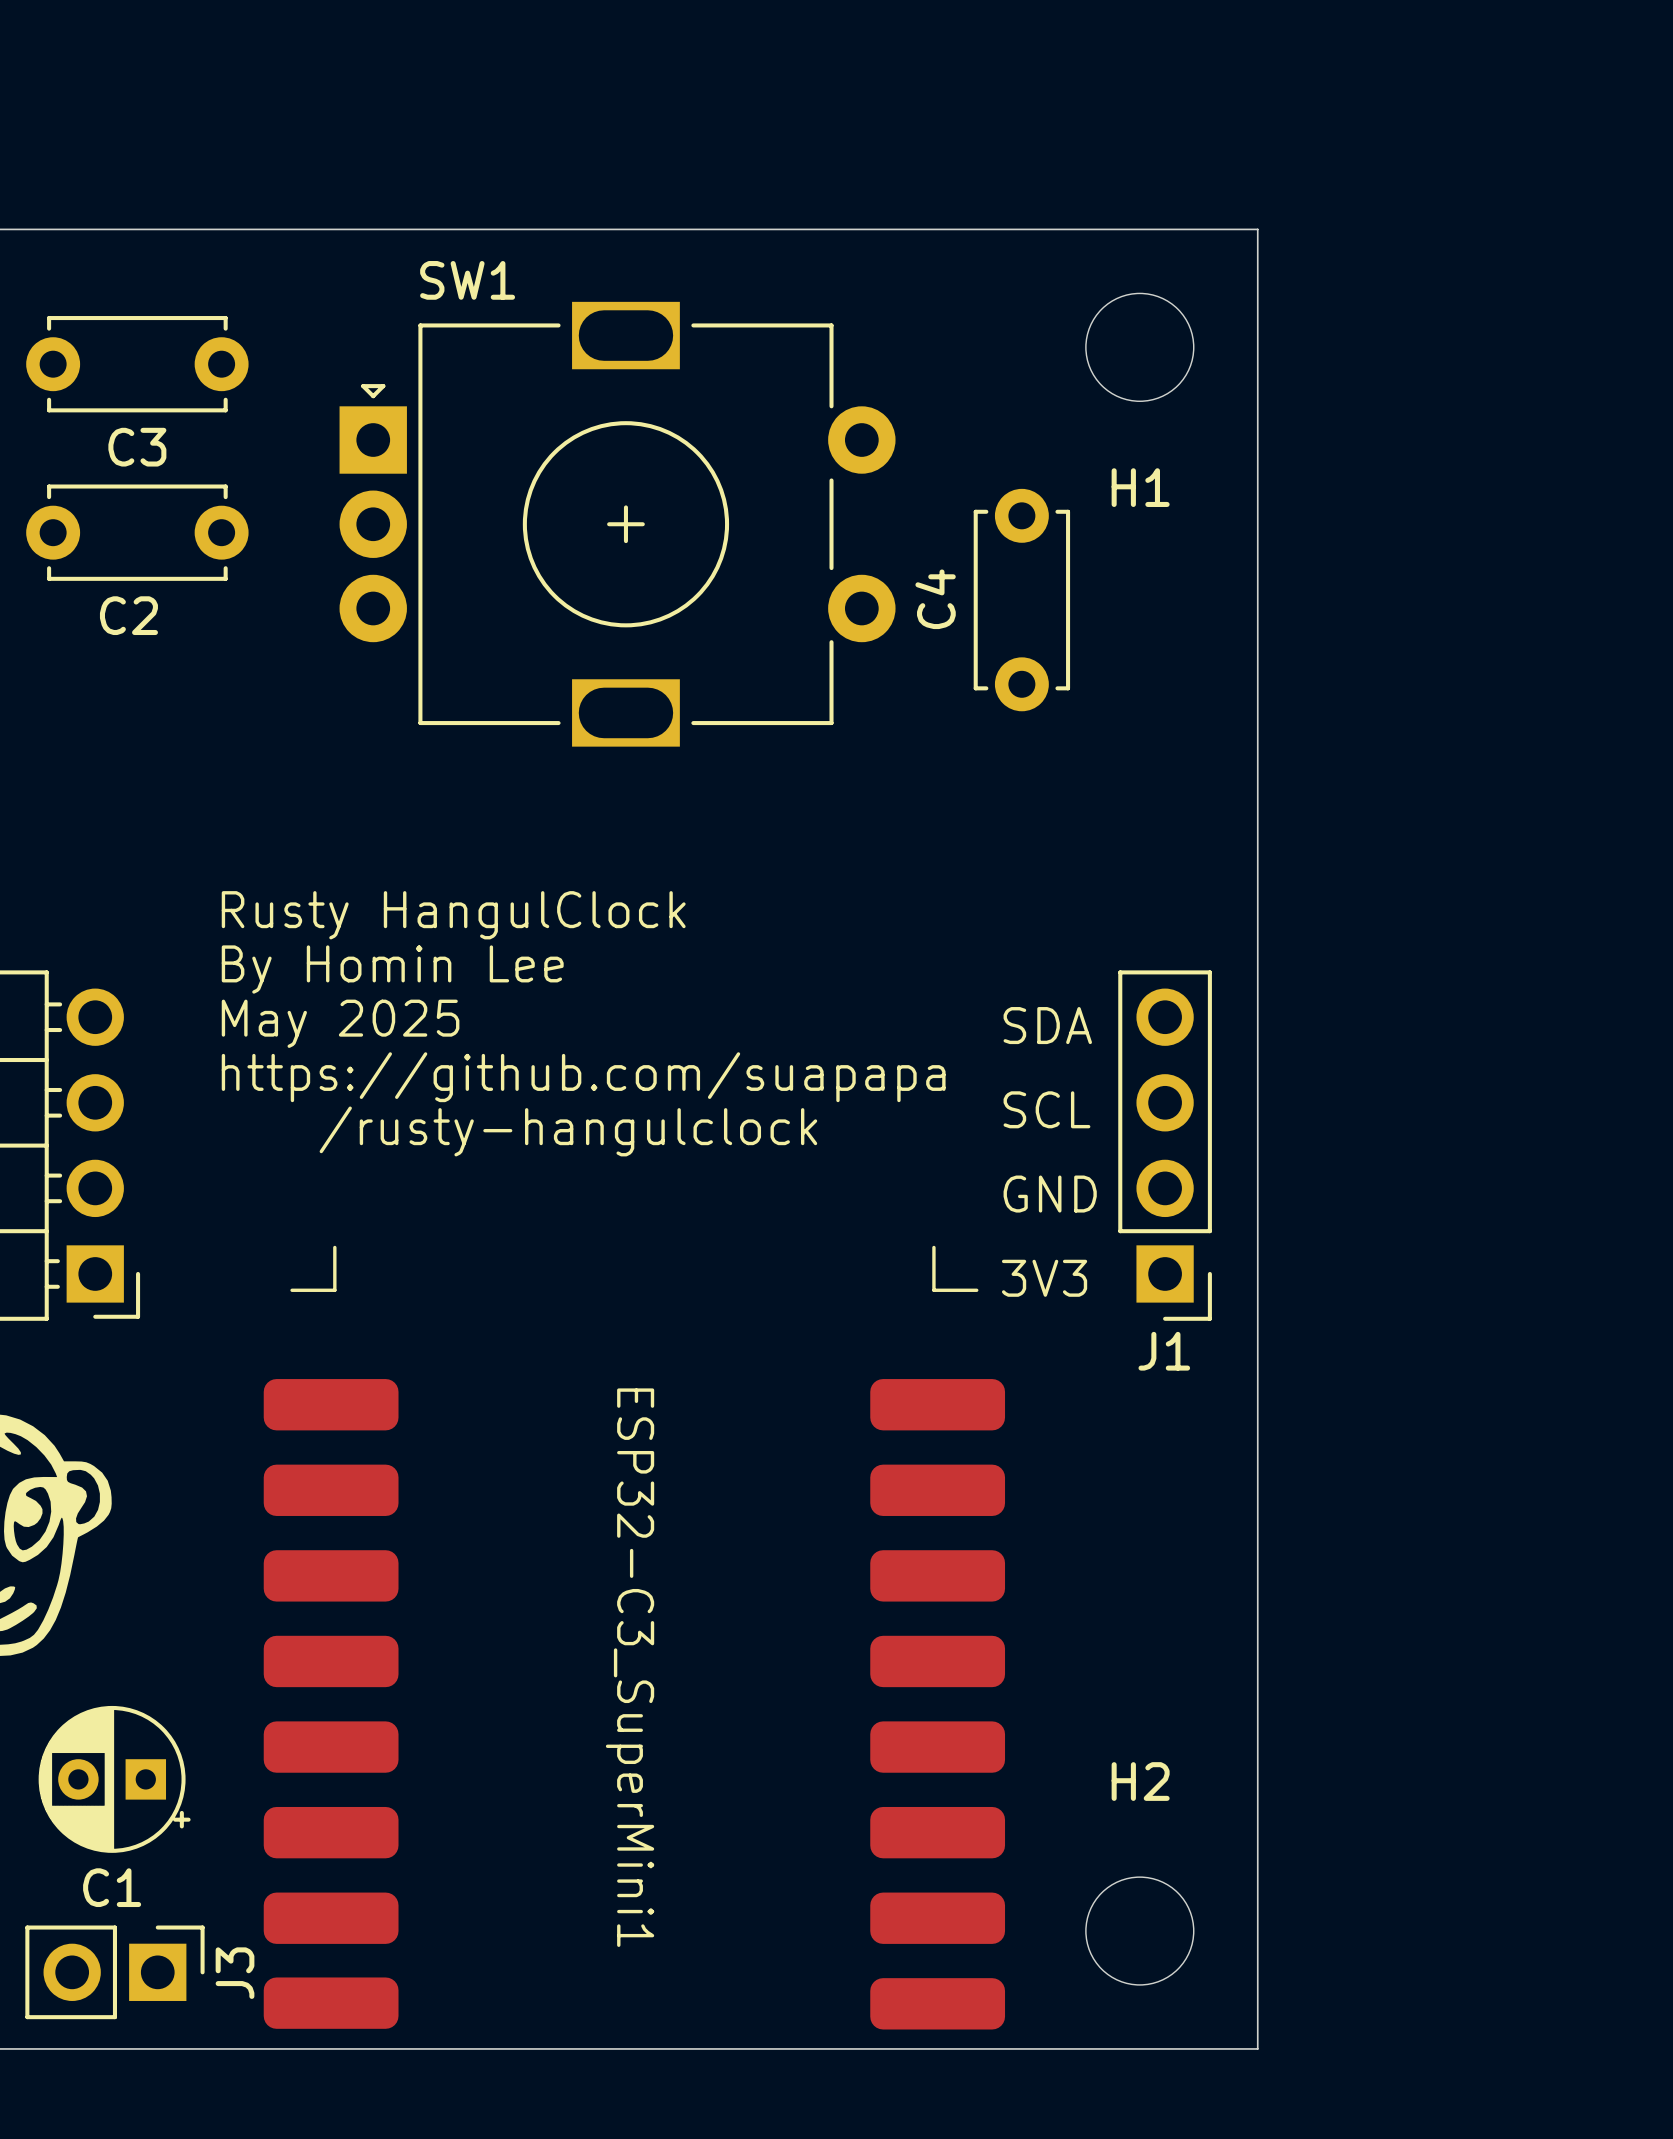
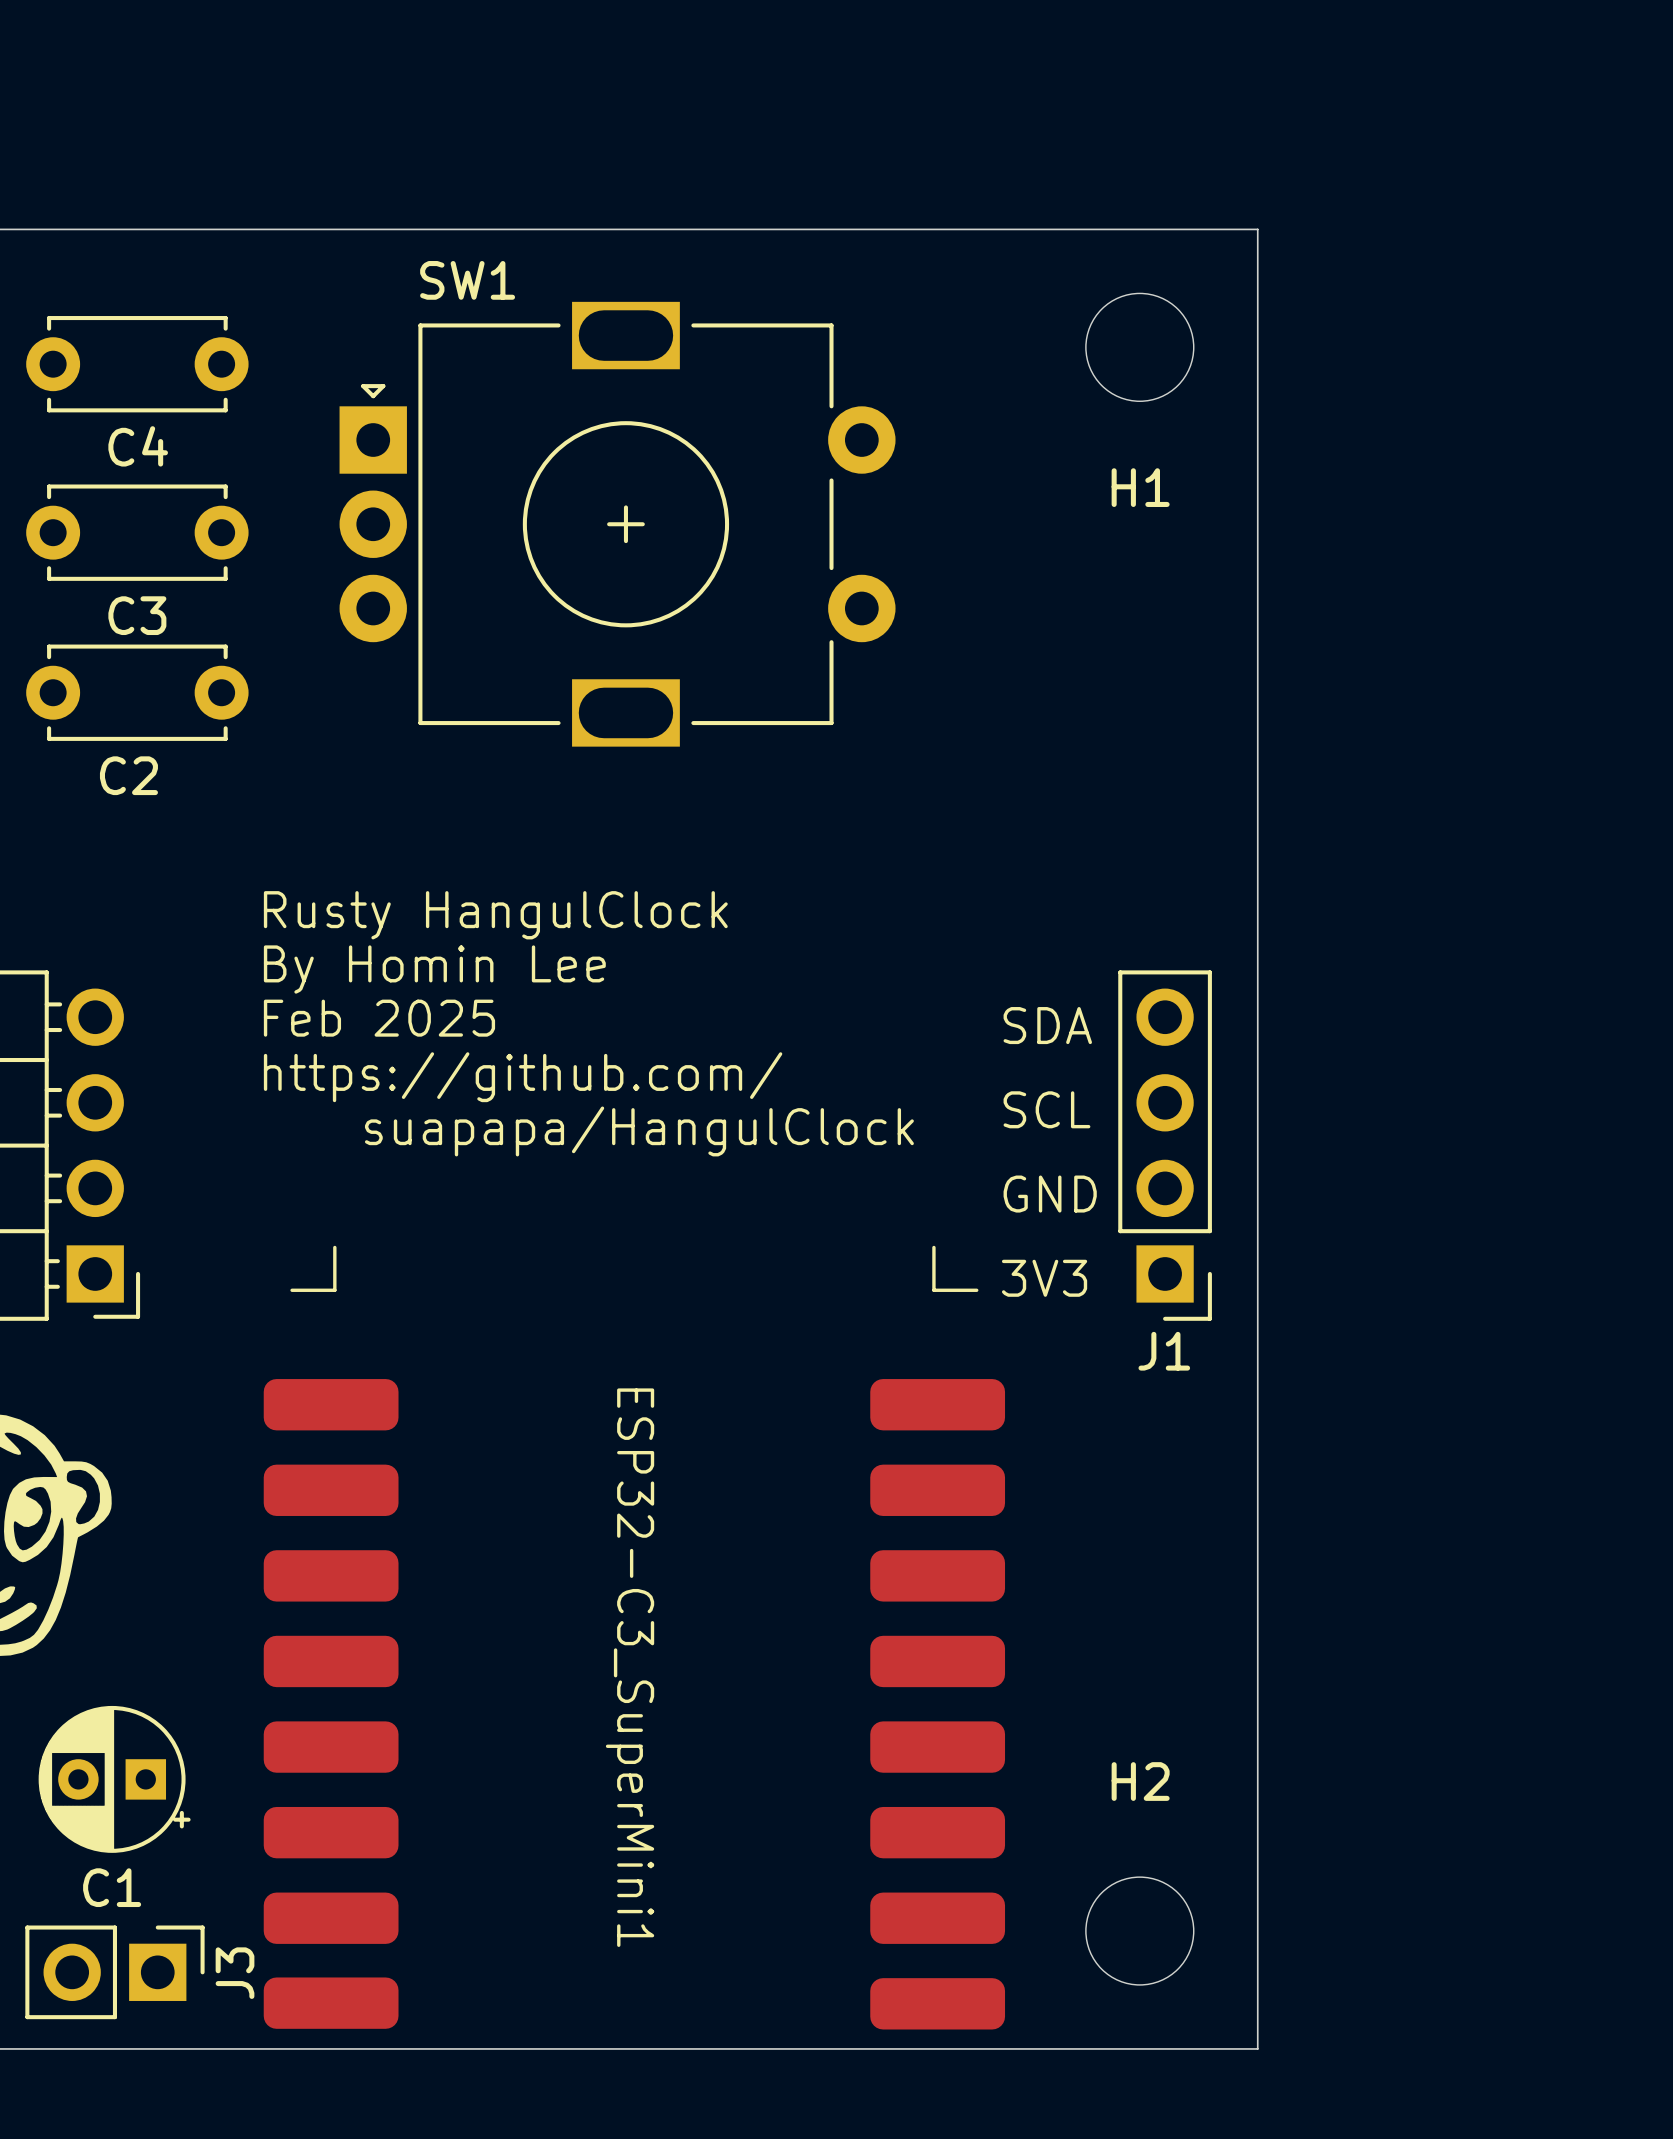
C3 name: C3 (137, 447) -> C4 (138, 446)
C4: (1021, 600) -> none
C2 name: C2 (128, 615) -> C3 (137, 615)
C2: none -> (137, 692)
text position: Rusty HangulClock (453, 915) -> Rusty HangulClock (495, 915)
text position: By Homin Lee (392, 969) -> By Homin Lee (434, 969)
text: May 2025 (340, 1023) -> Feb 2025 (379, 1018)
text: https://github.com/suapapa (583, 1077) -> https://github.com/ (523, 1077)
text: /rusty-hangulclock (568, 1131) -> suapapa/HangulClock (639, 1131)

